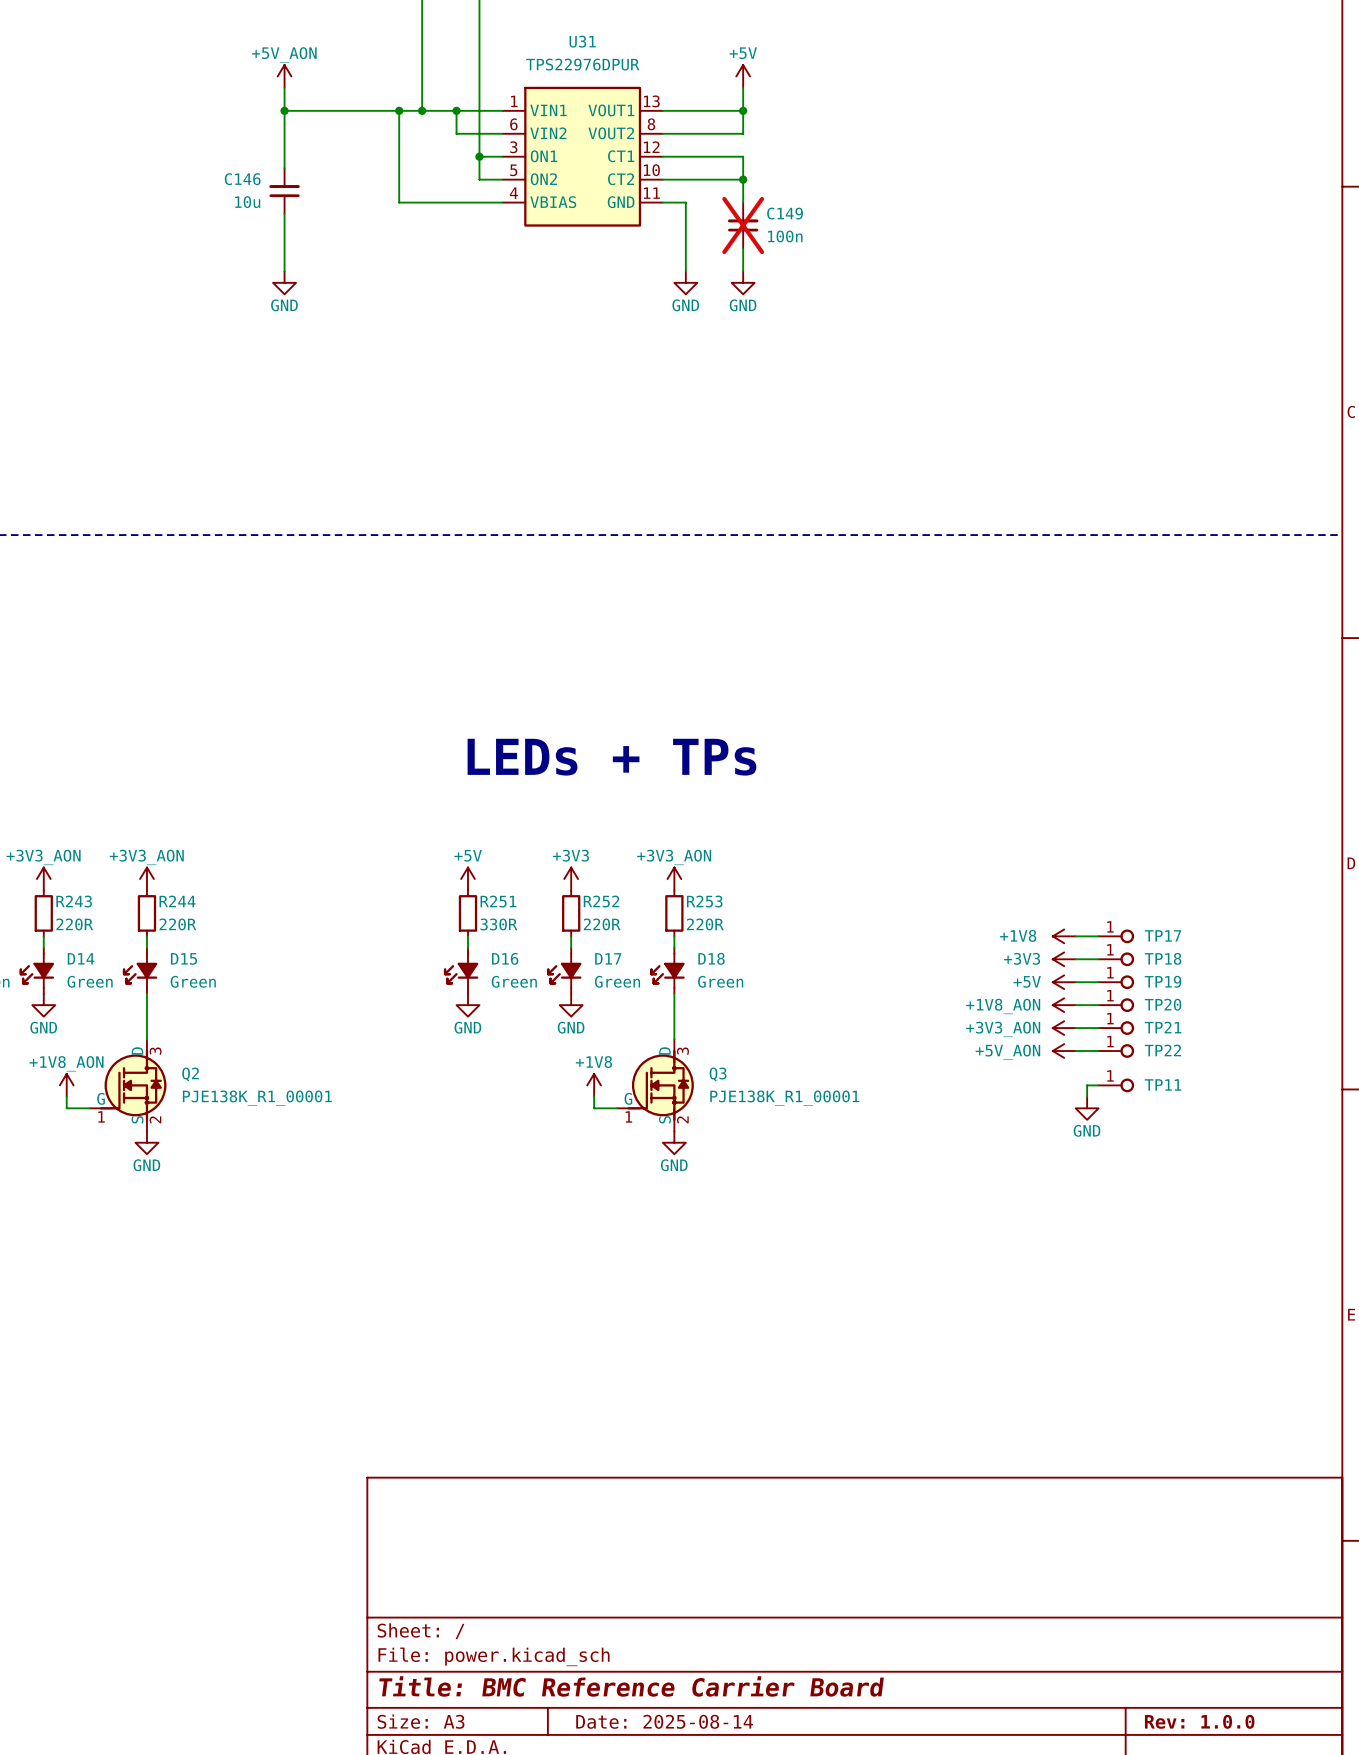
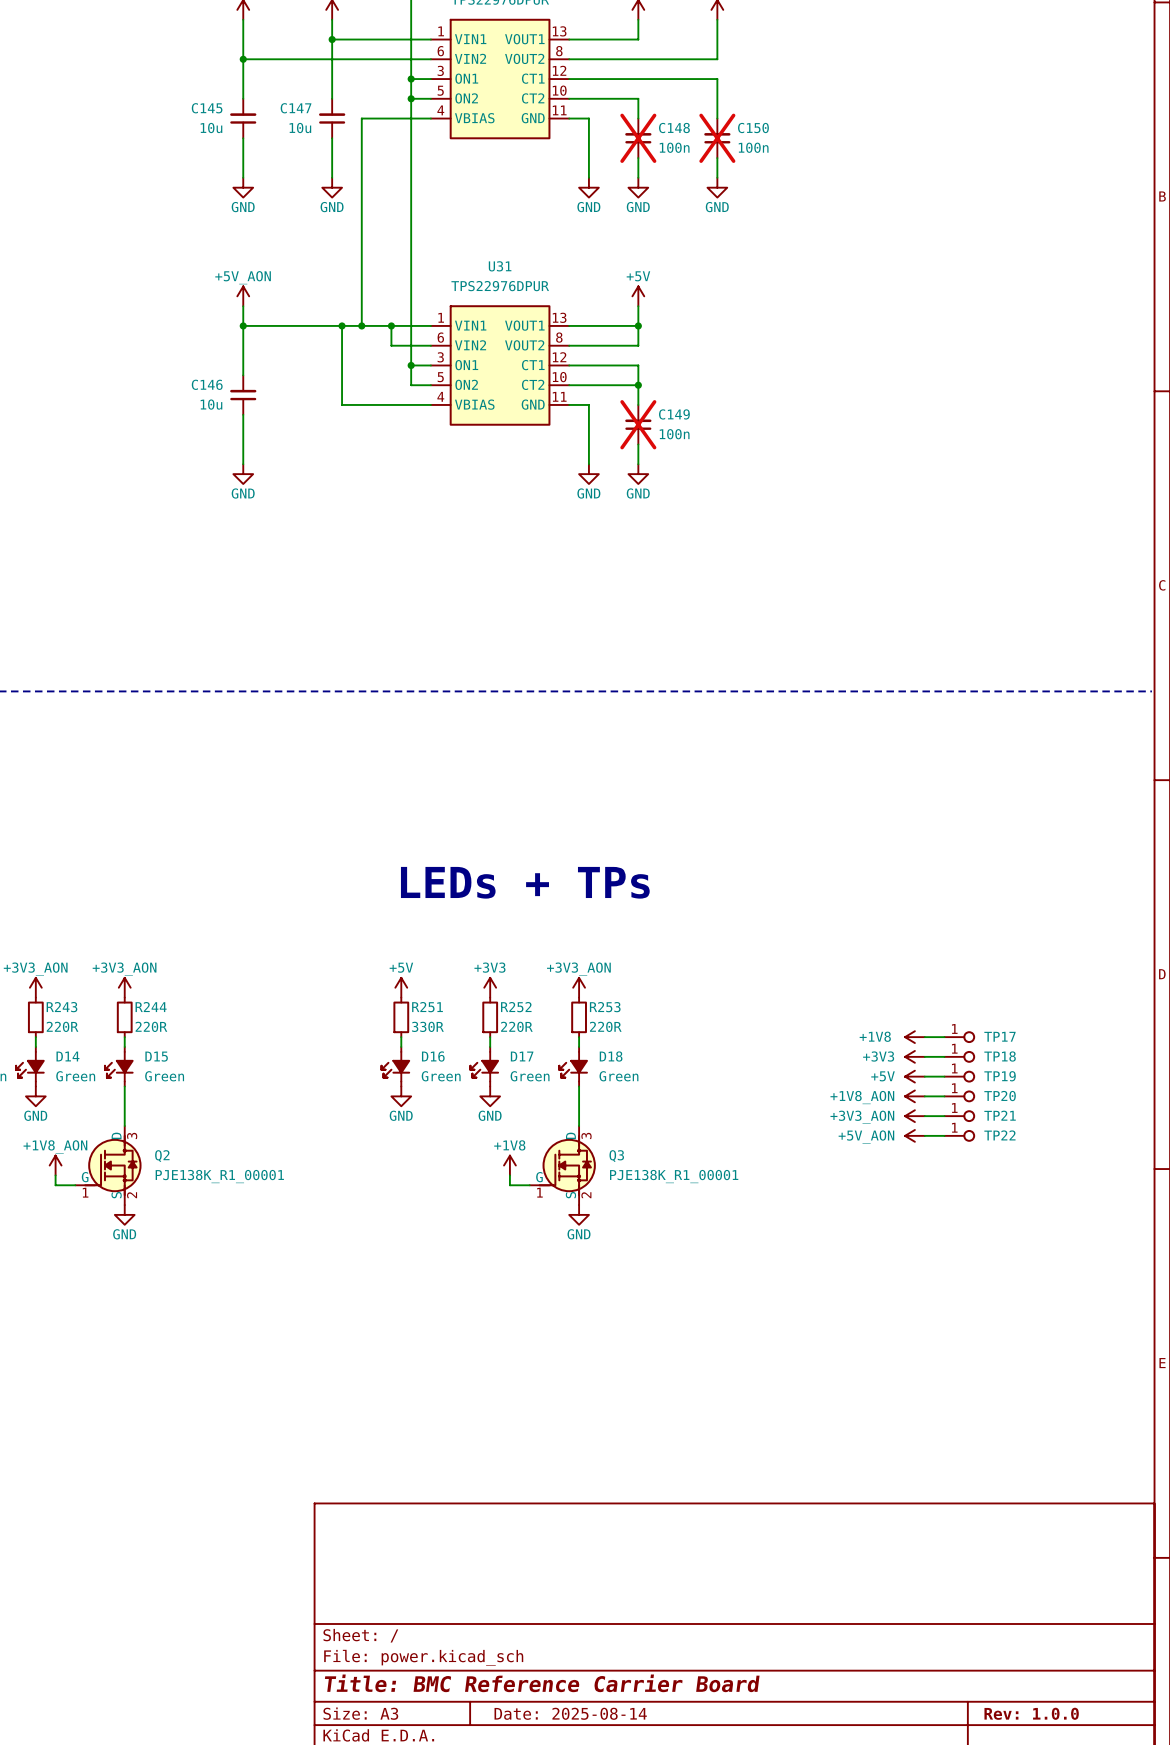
wire: (1098, 1085) (1087, 1085) (1087, 1096) -> none
TP11: (1116, 1085) -> none
power symbol: GND (1087, 1108) -> none

